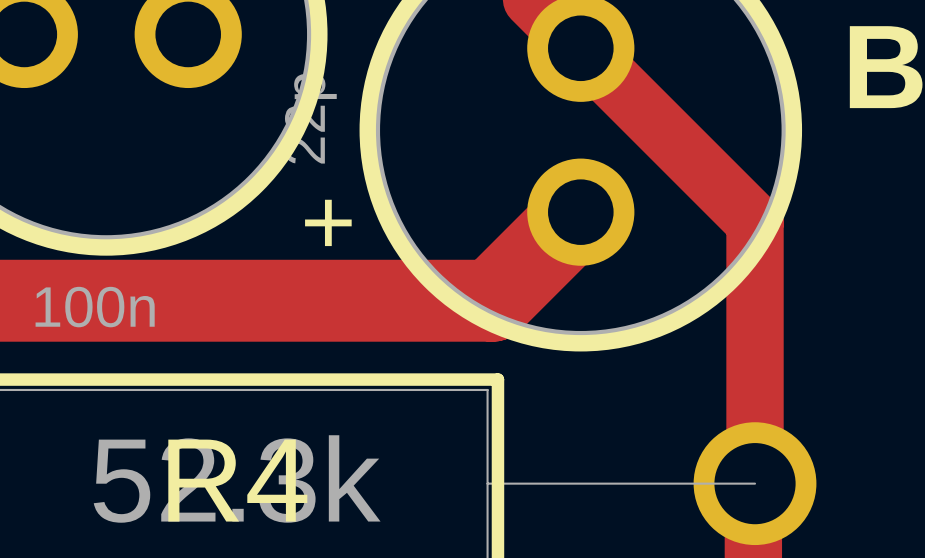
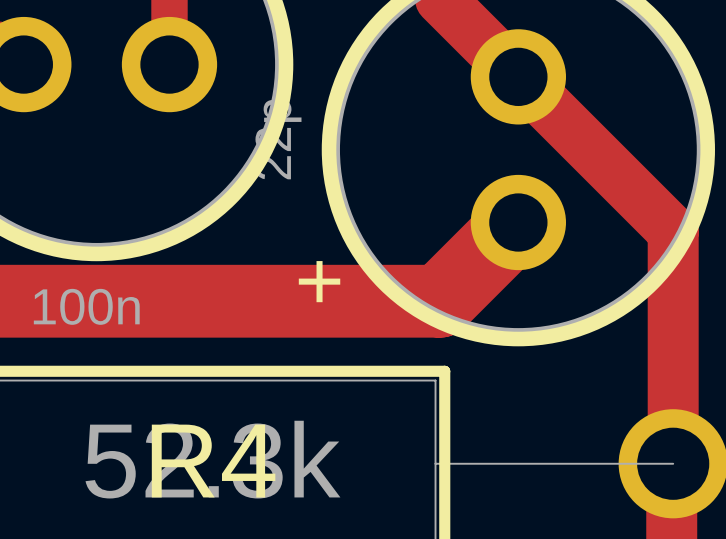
part text position: + (328, 222) -> + (319, 281)

